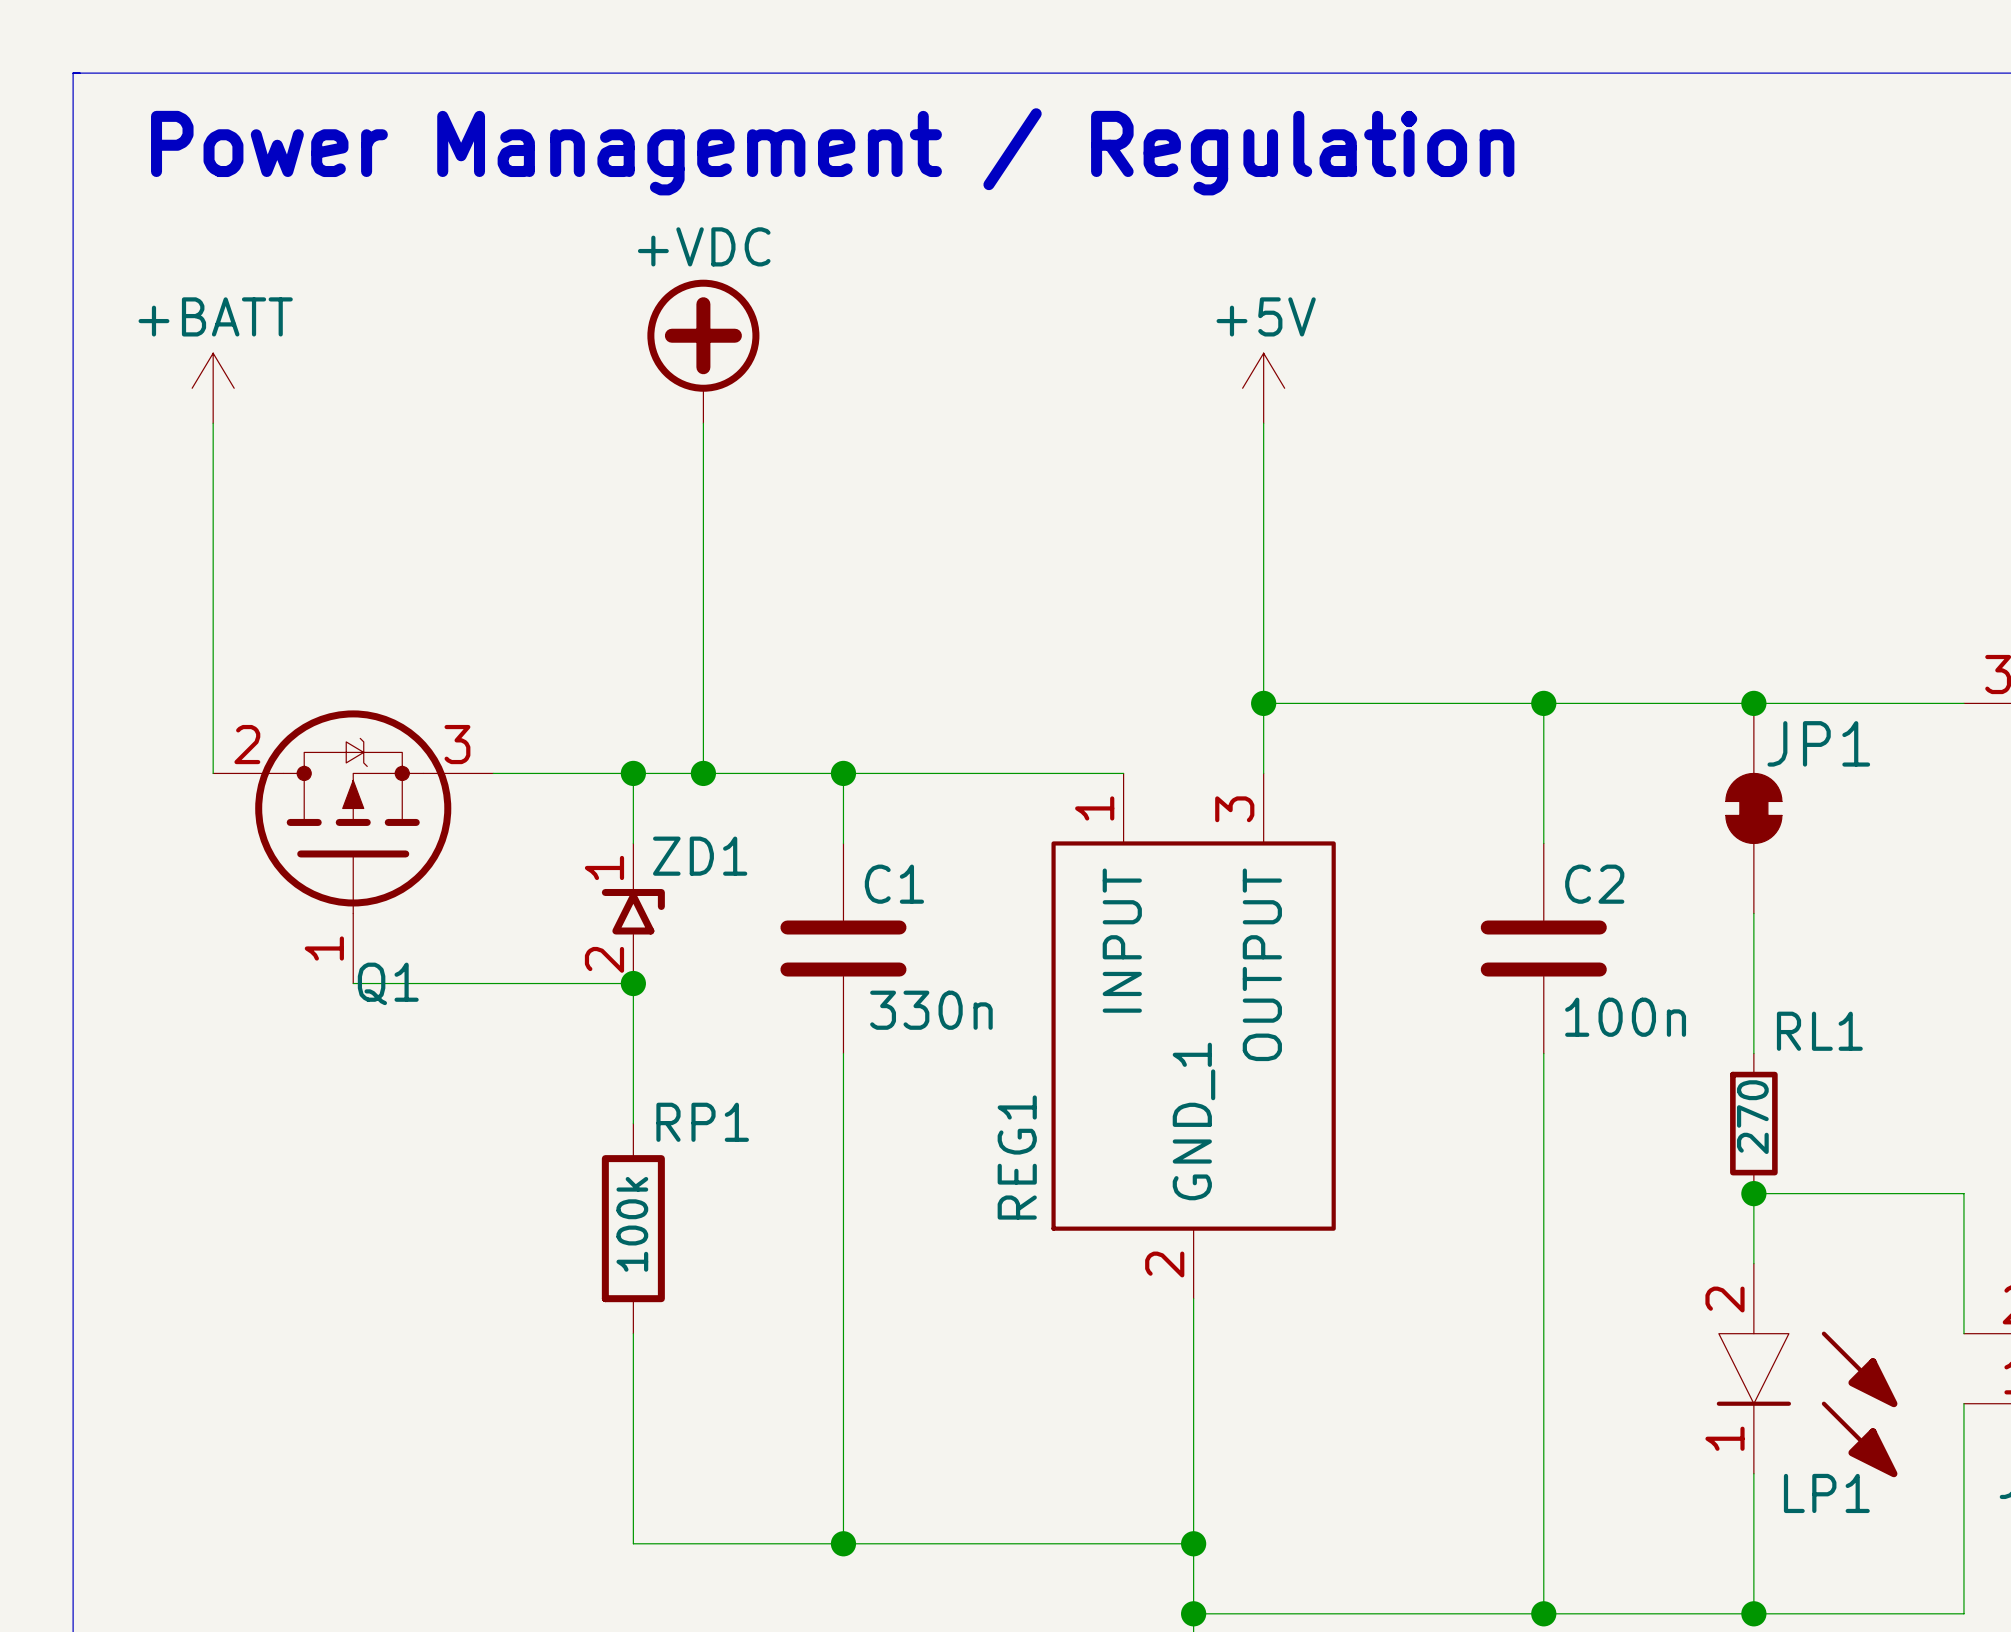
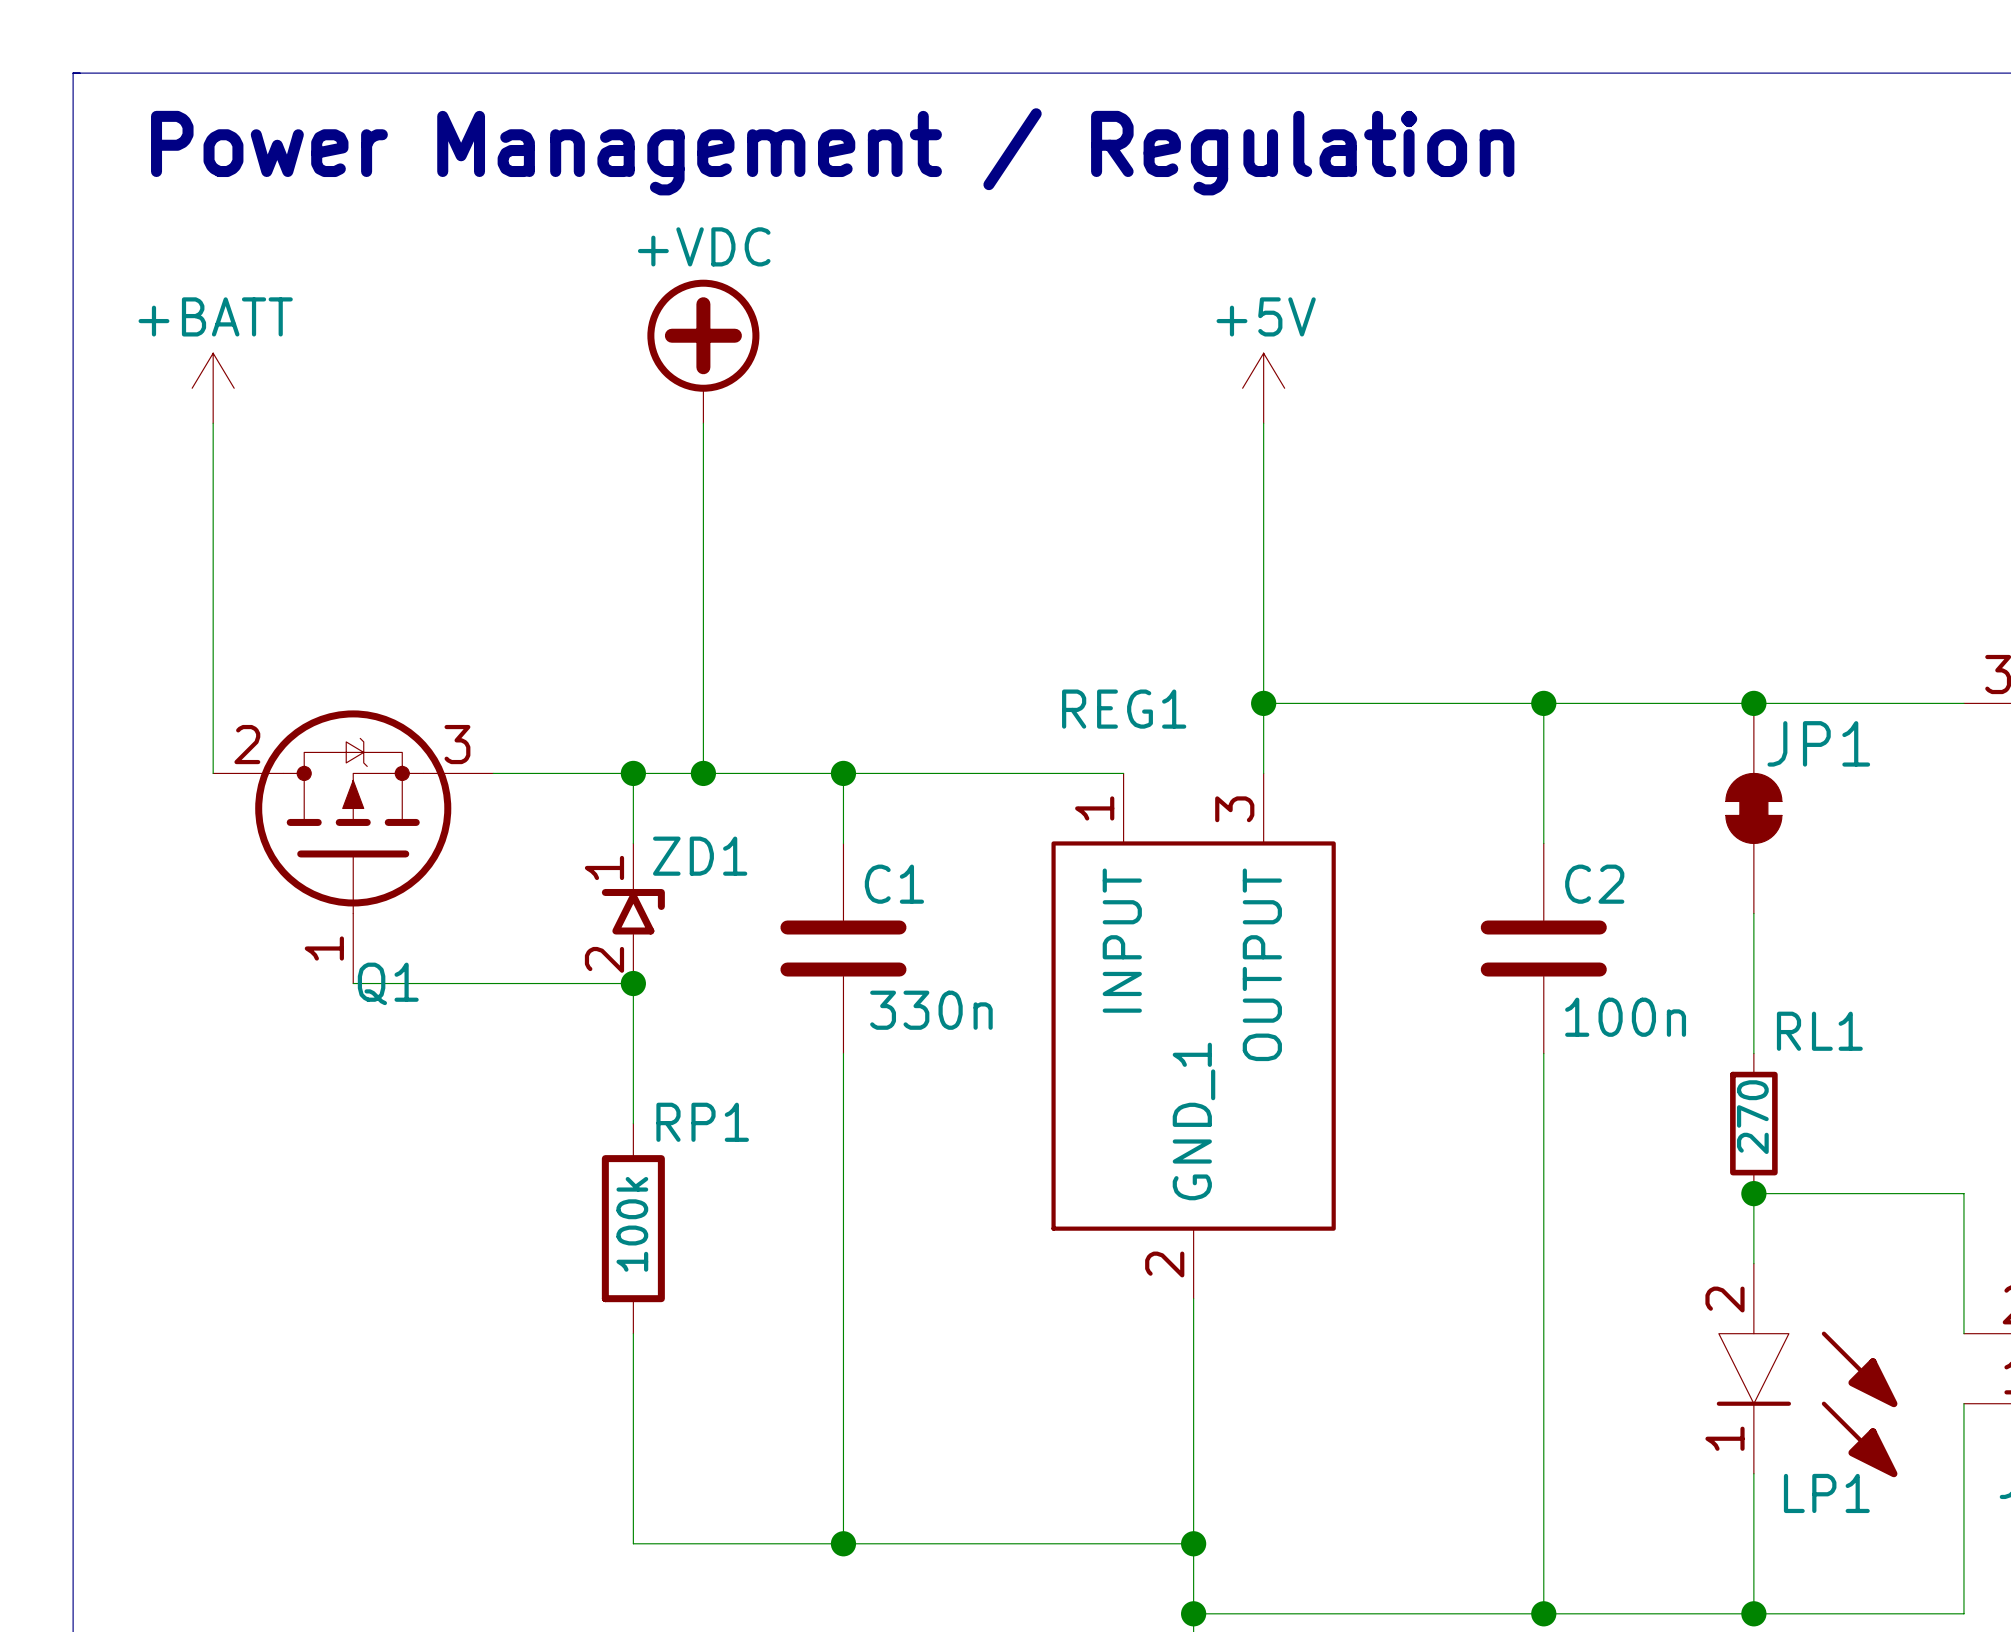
REG1 name rotation: 0° (1017, 1157) -> 90° clockwise (1124, 709)
REG1 name position: REG1 (1017, 1157) -> REG1 (1124, 709)

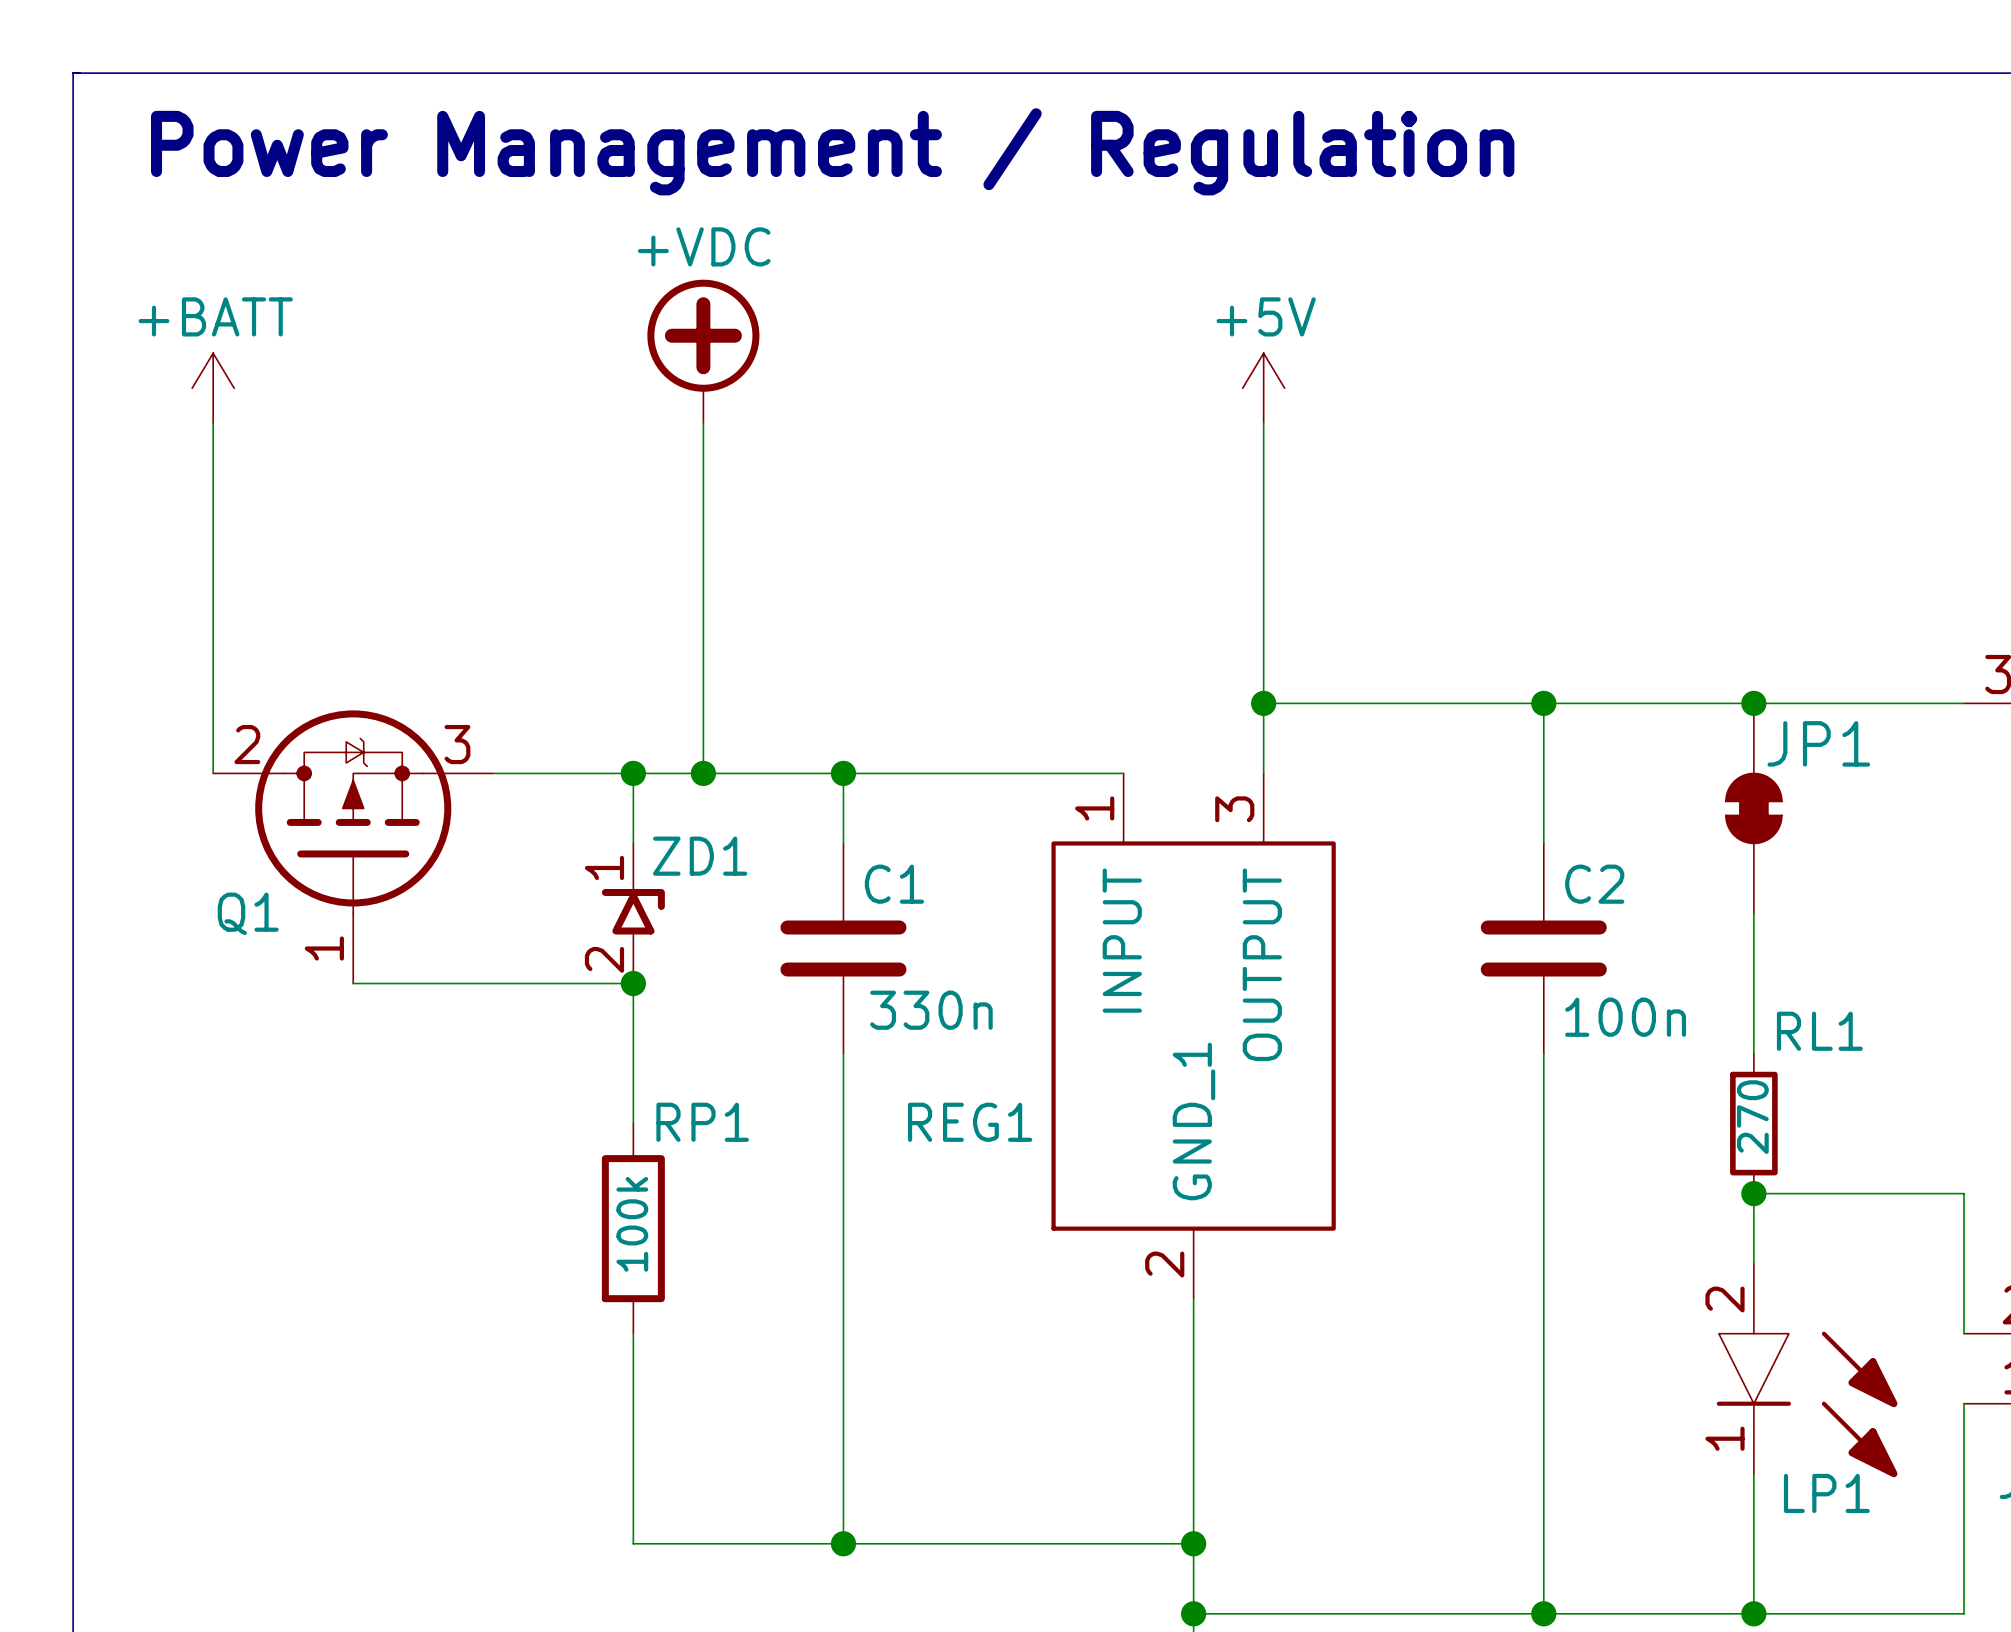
REG1 name position: REG1 (1124, 709) -> REG1 (970, 1122)
Q1 name position: Q1 (388, 983) -> Q1 (248, 913)

